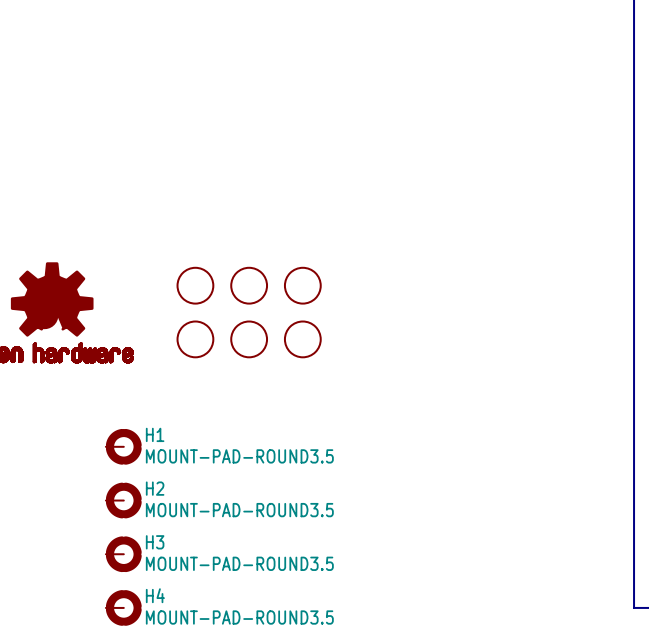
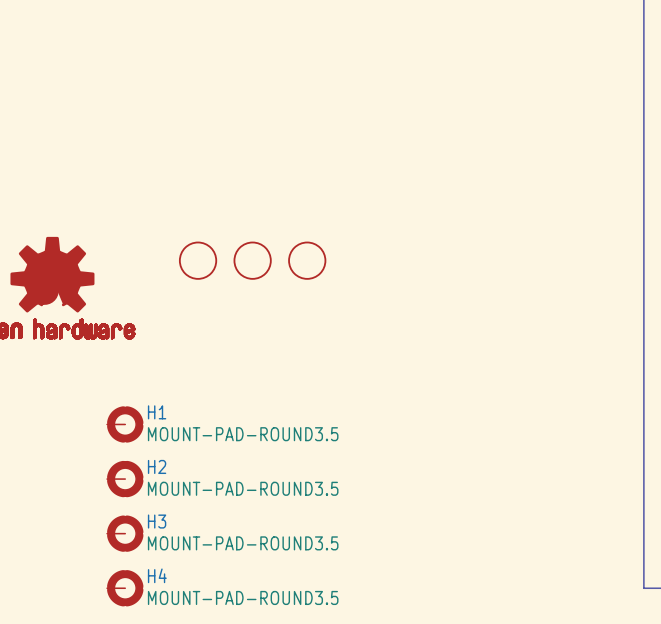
part: (195, 339) -> none
part: (249, 339) -> none
part: (302, 339) -> none

